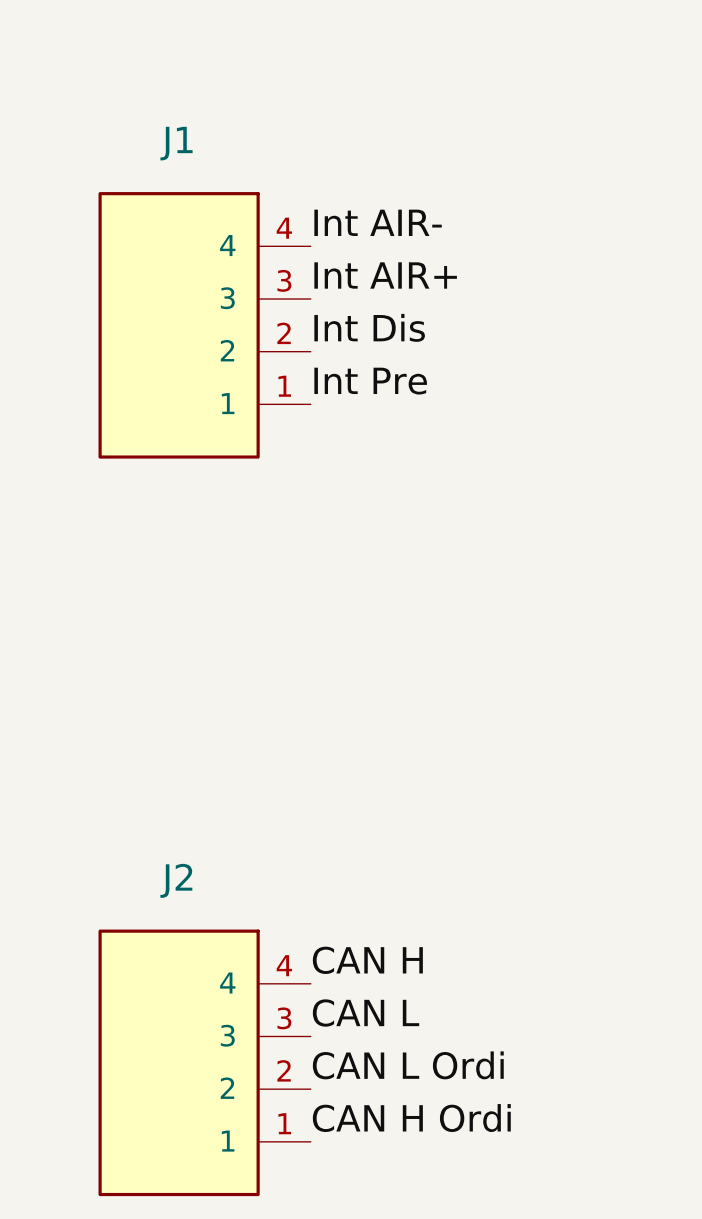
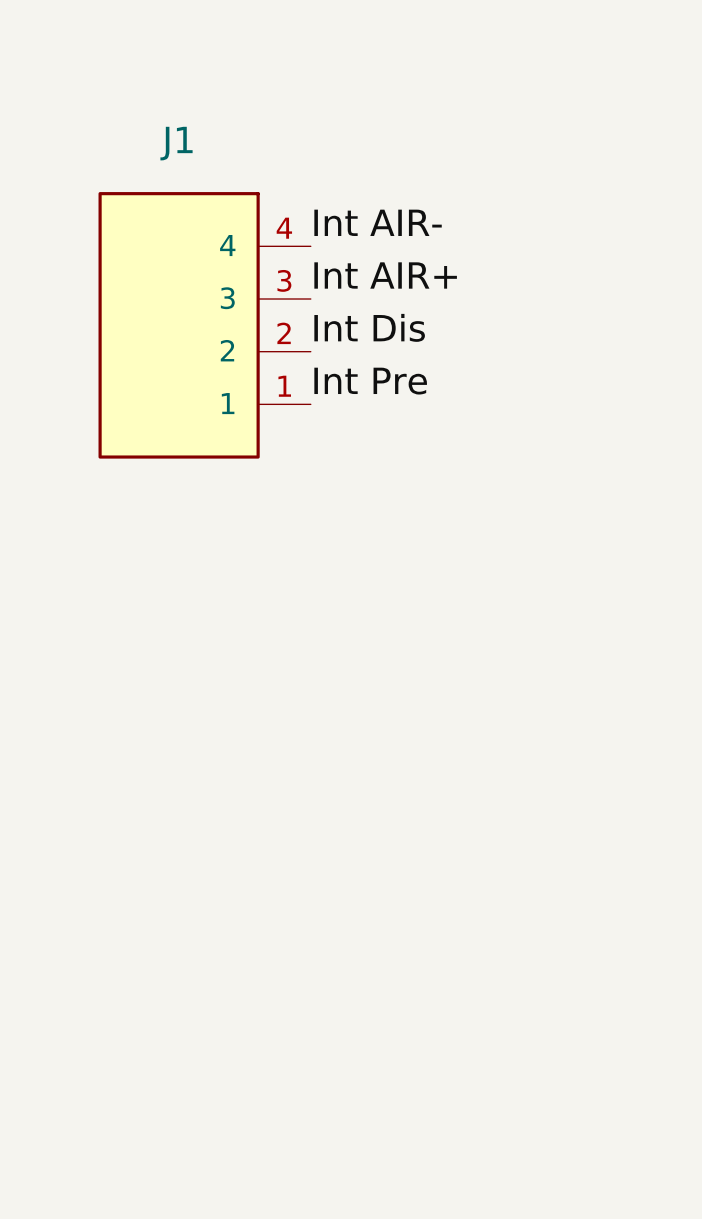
label: CAN H (367, 960) -> none
label: CAN L (366, 1013) -> none
J2: (204, 1062) -> none
label: CAN L Ordi (408, 1065) -> none
label: CAN H Ordi (411, 1118) -> none

